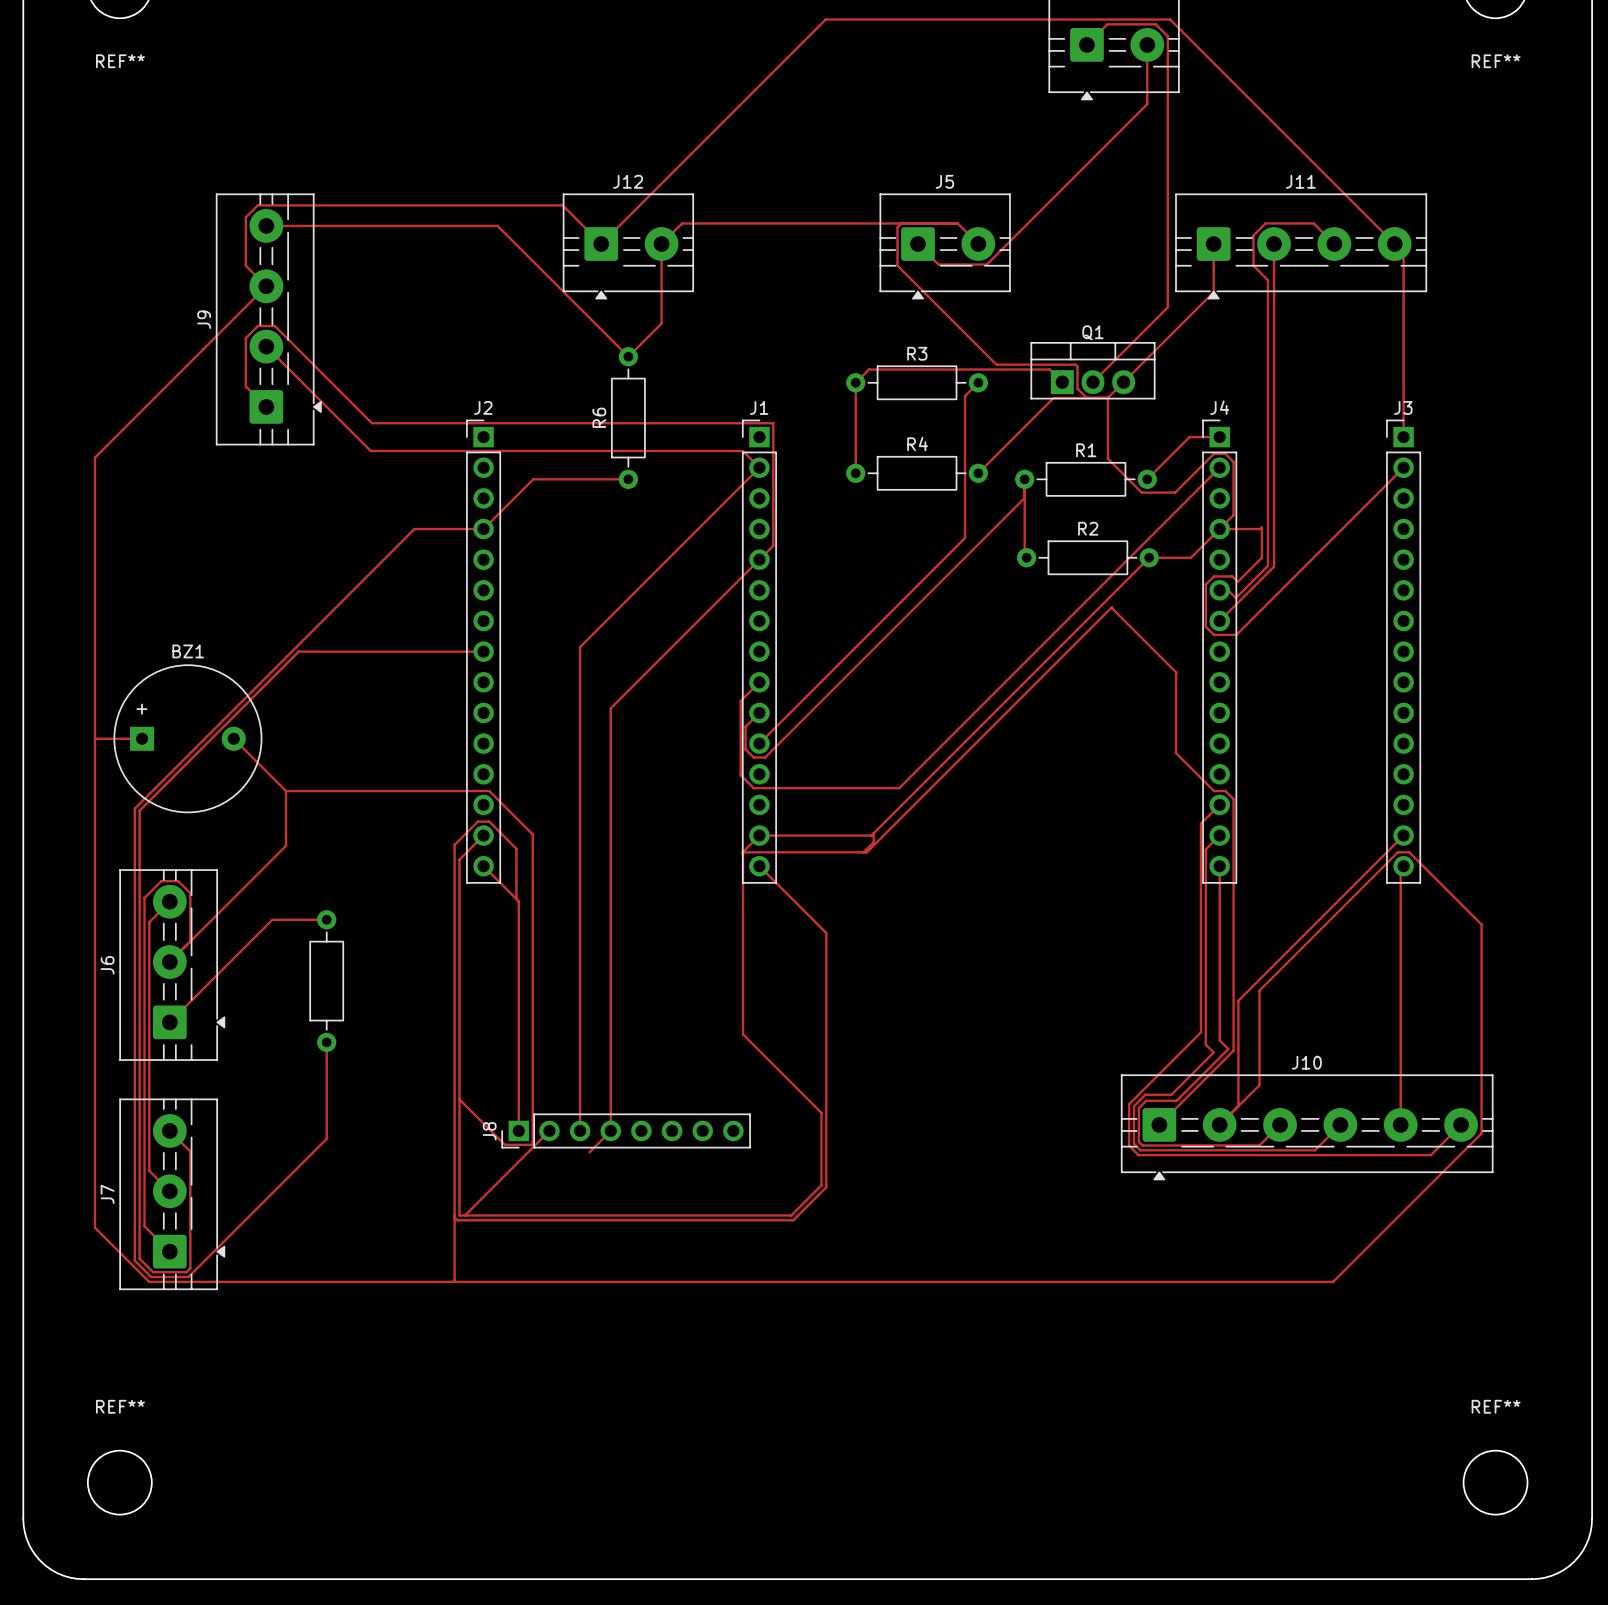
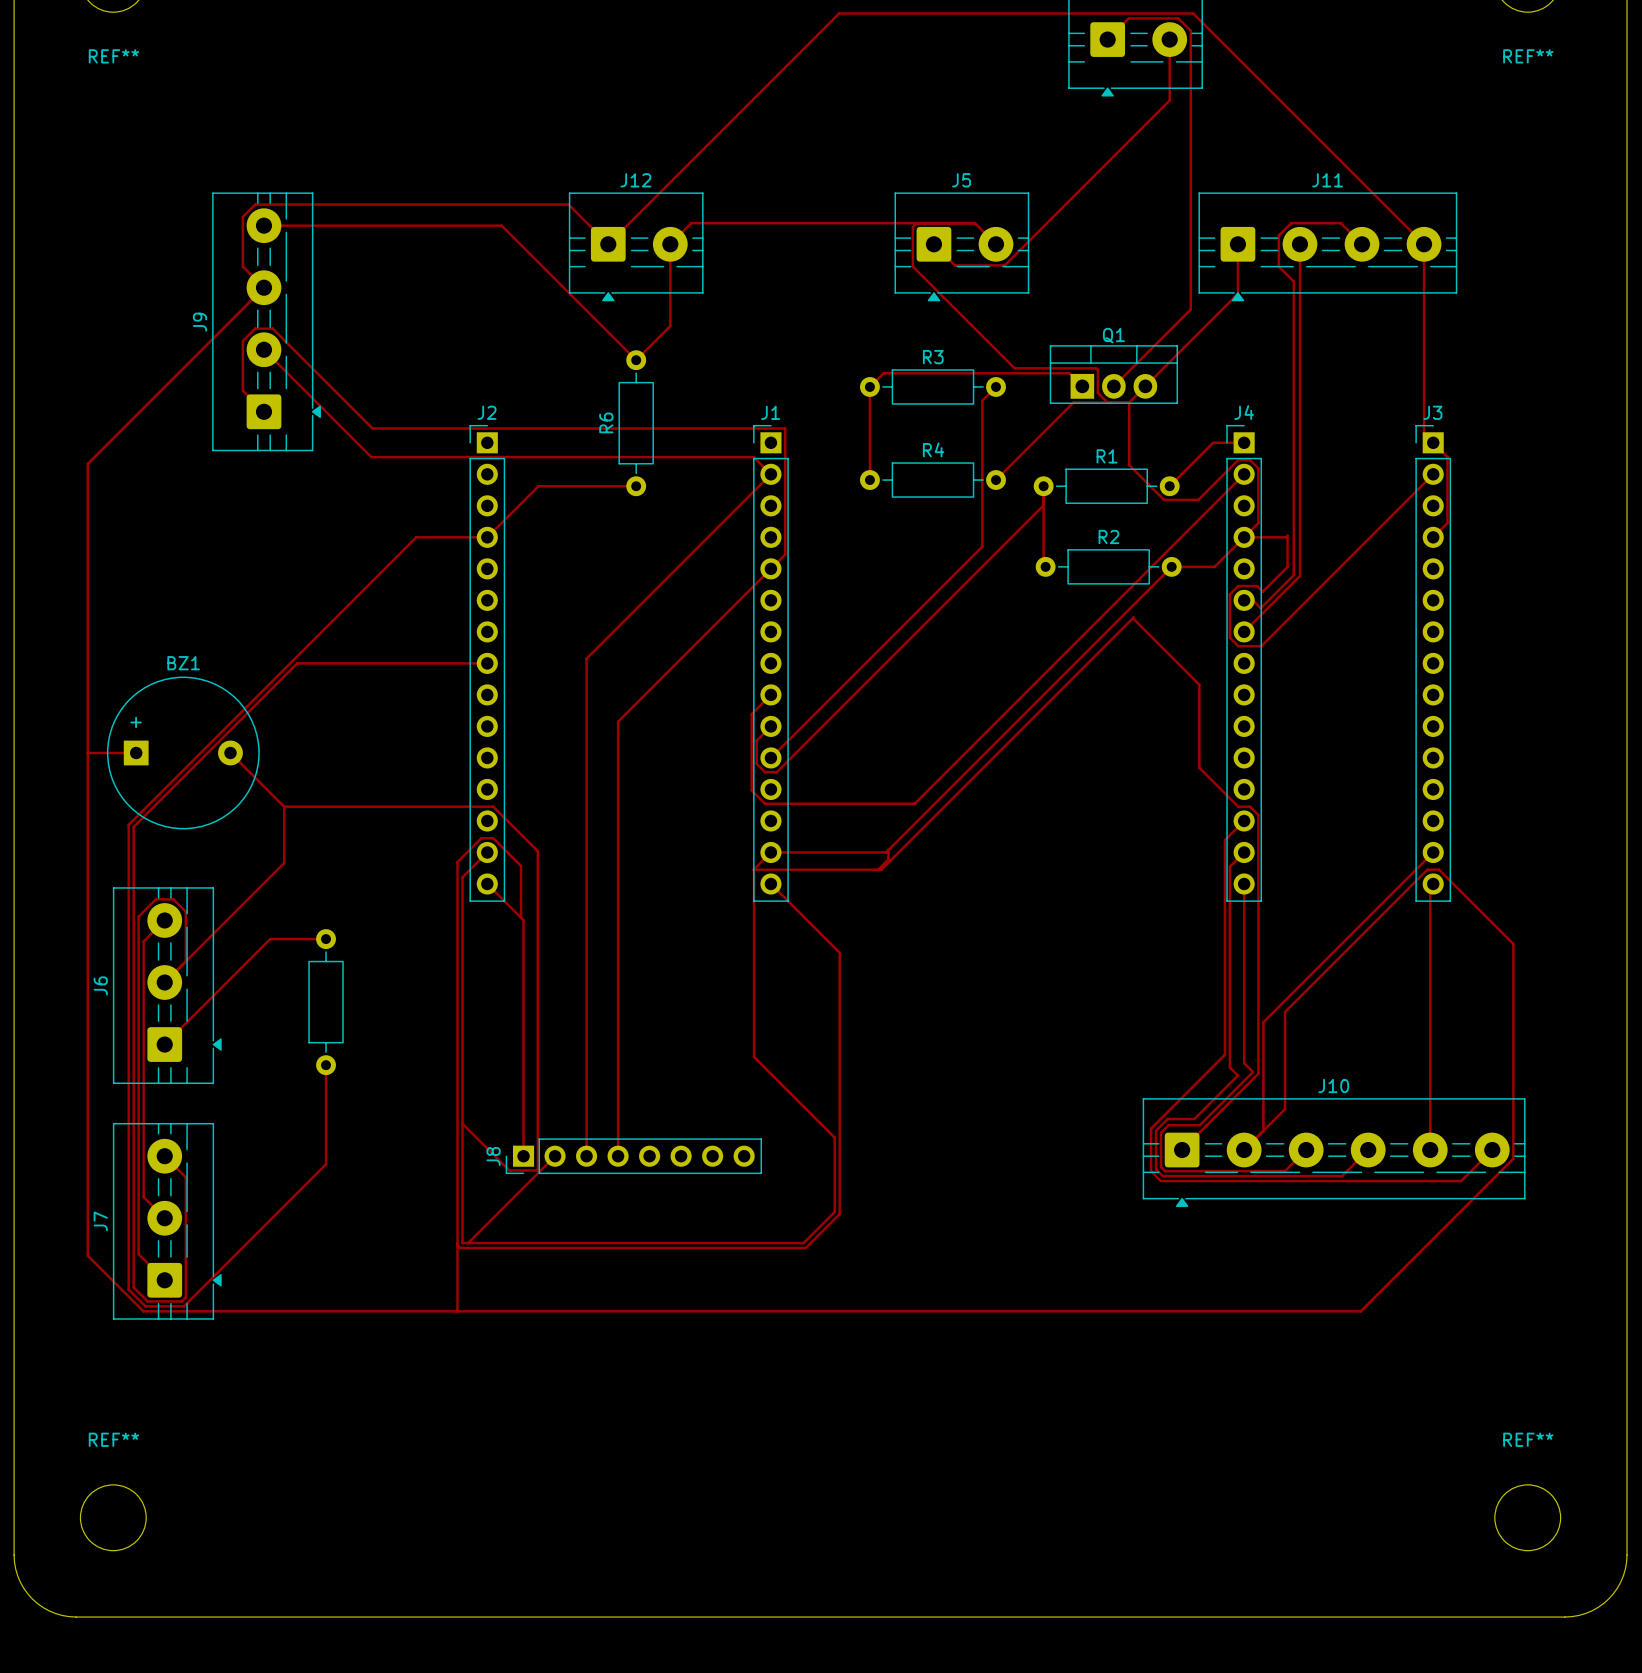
top track: none -> (1424, 244) (1424, 433) (1447, 457) (1447, 523) (1433, 537)
top track: (1403, 252) (1403, 437) -> none
top track: (610, 1130) (589, 1152) -> none

